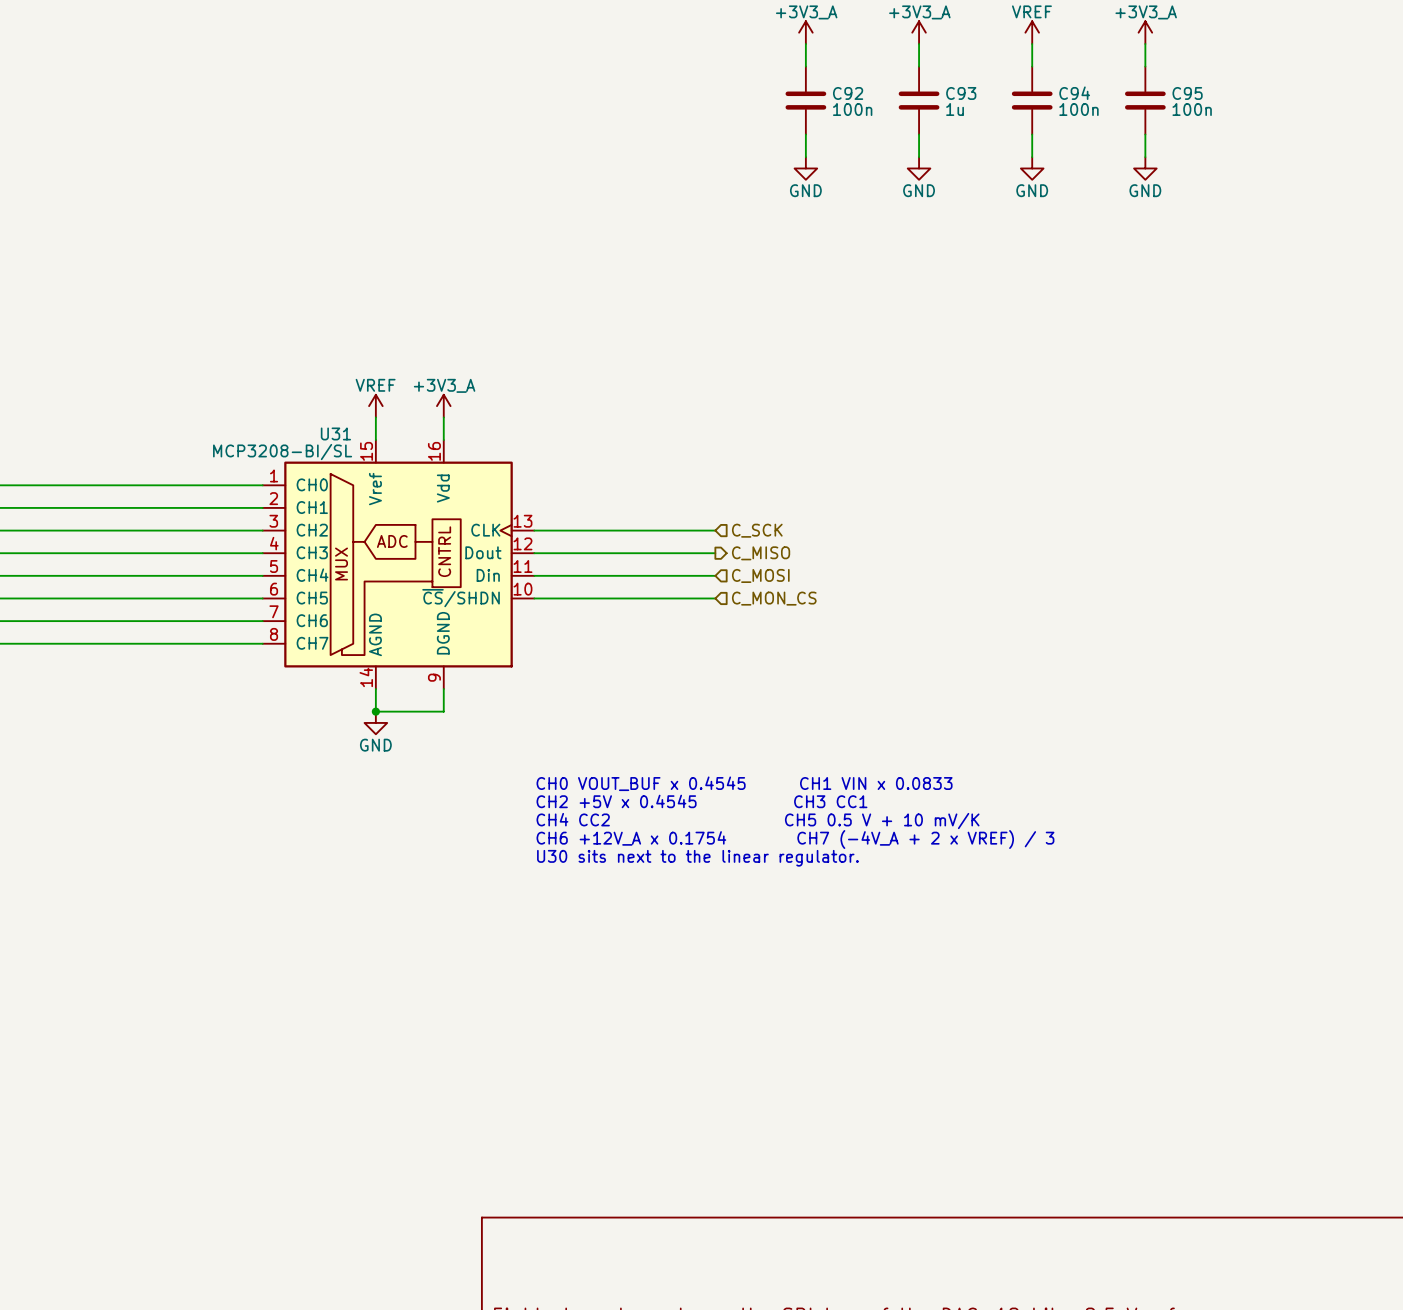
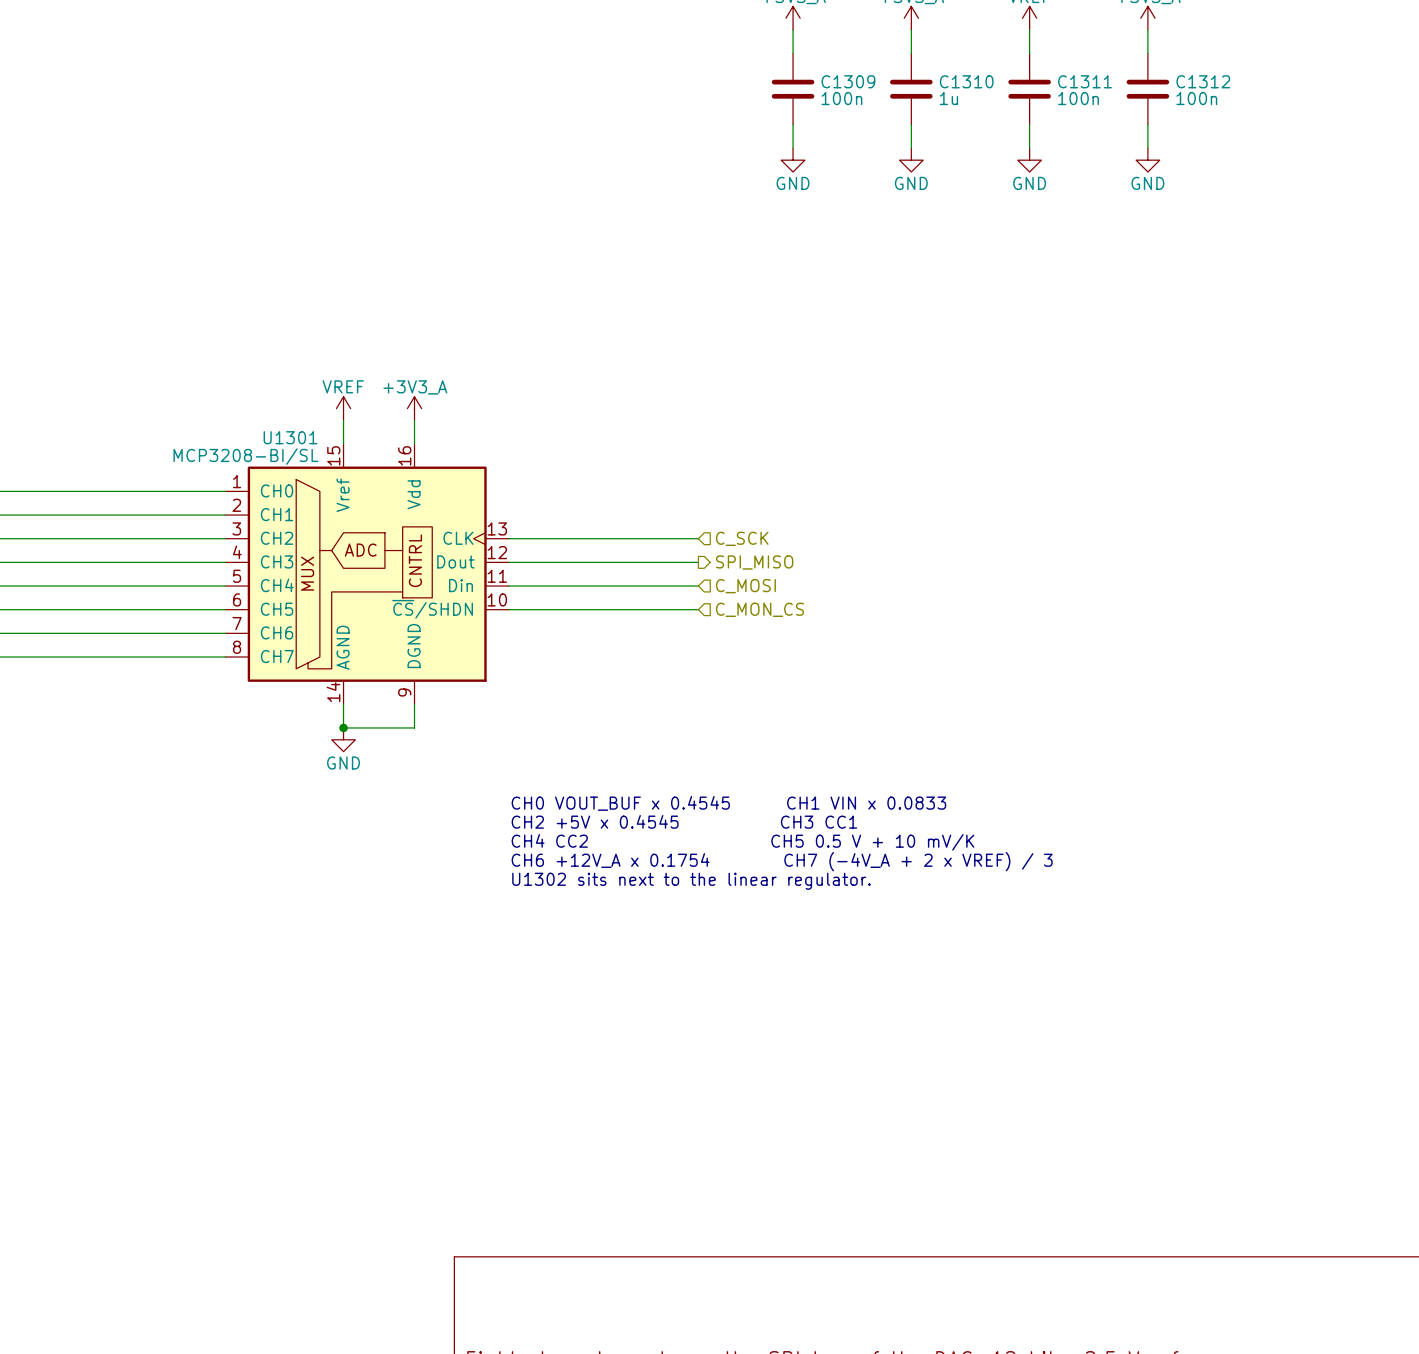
C92 name: C92 (848, 93) -> C1309 (848, 81)
C93 name: C93 (961, 93) -> C1310 (966, 81)
C94 name: C94 (1074, 93) -> C1311 (1085, 81)
C95 name: C95 (1187, 93) -> C1312 (1203, 81)
U31 name: U31 (335, 433) -> U1301 (290, 437)
hierarchical label: C_MISO (761, 553) -> SPI_MISO (754, 562)
text: U30 sits next to the linear regulator. (697, 858) -> U1302 sits next to the linear regulator. (691, 881)

